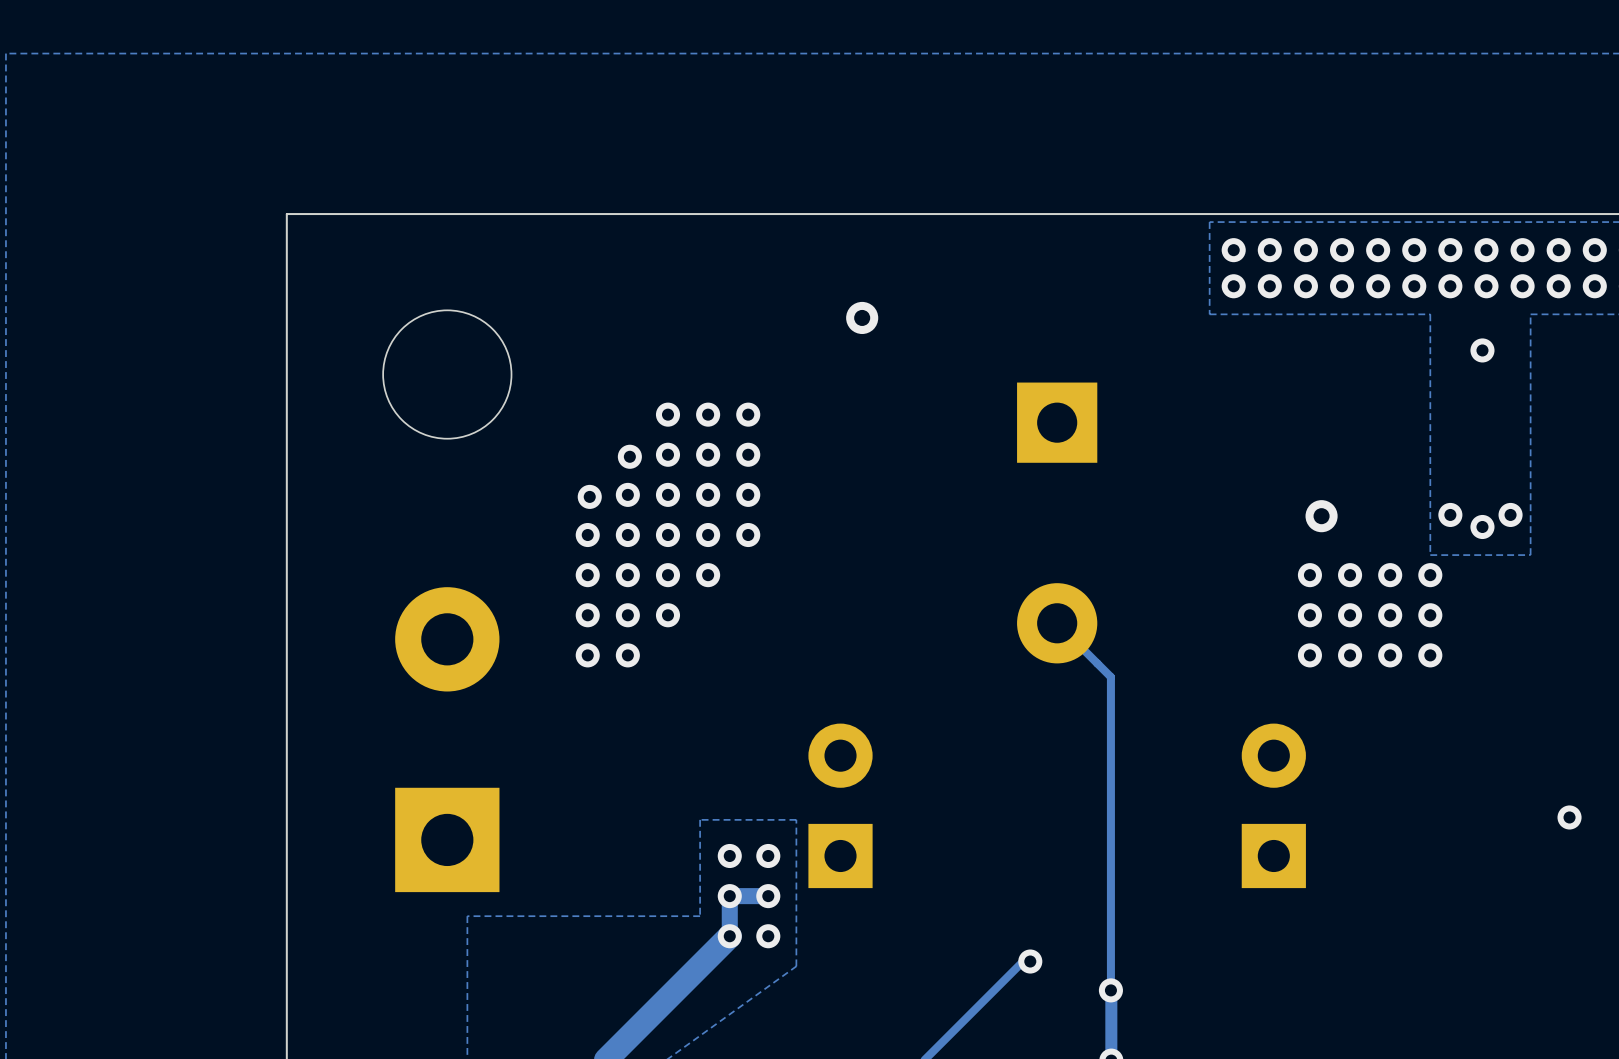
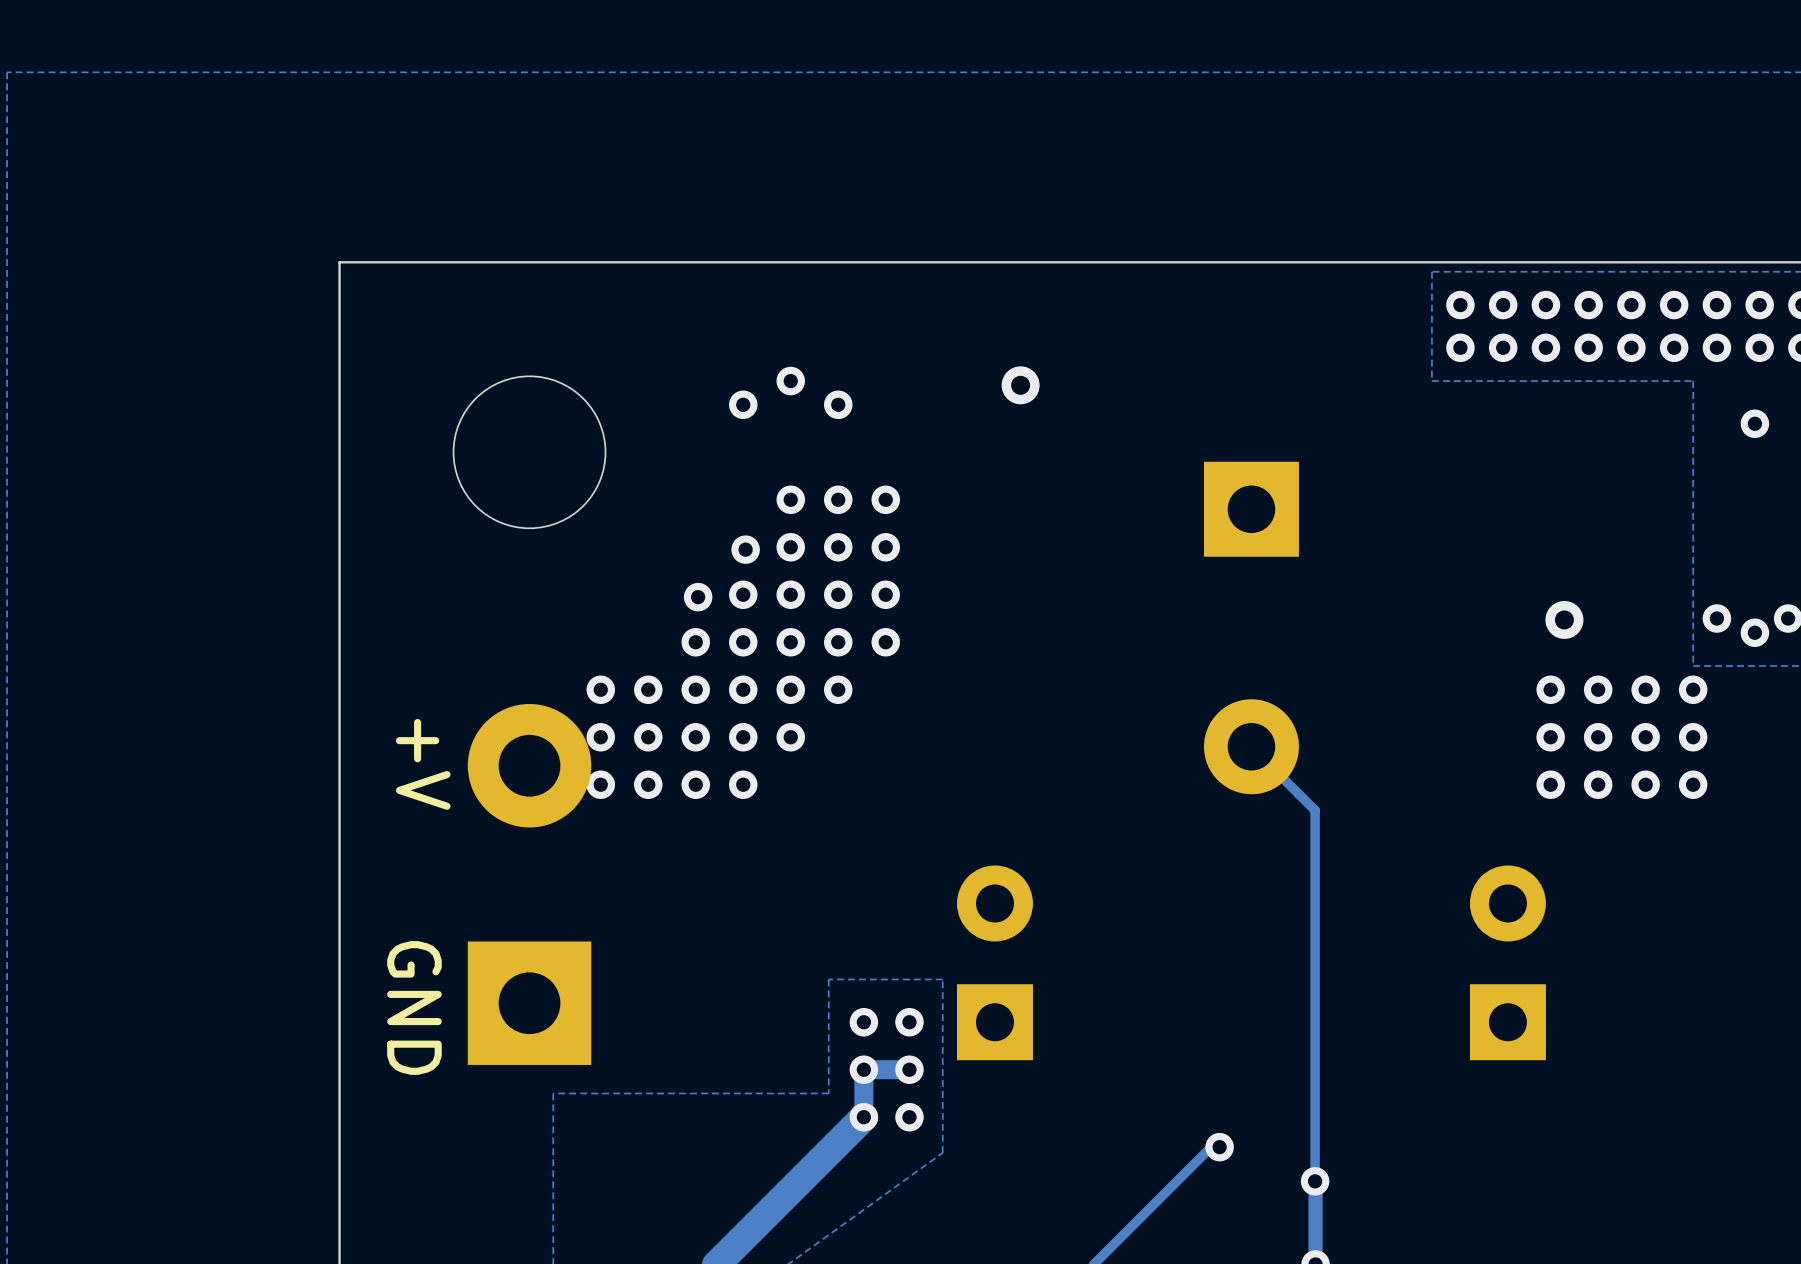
via: none -> (790, 381)
via: none -> (743, 404)
via: none -> (838, 404)
via: none -> (600, 689)
via: none -> (648, 689)
via: none -> (600, 737)
via: none -> (648, 737)
text: none -> +V (423, 764)
via: none -> (600, 784)
via: none -> (648, 784)
text: none -> GND (414, 1007)

